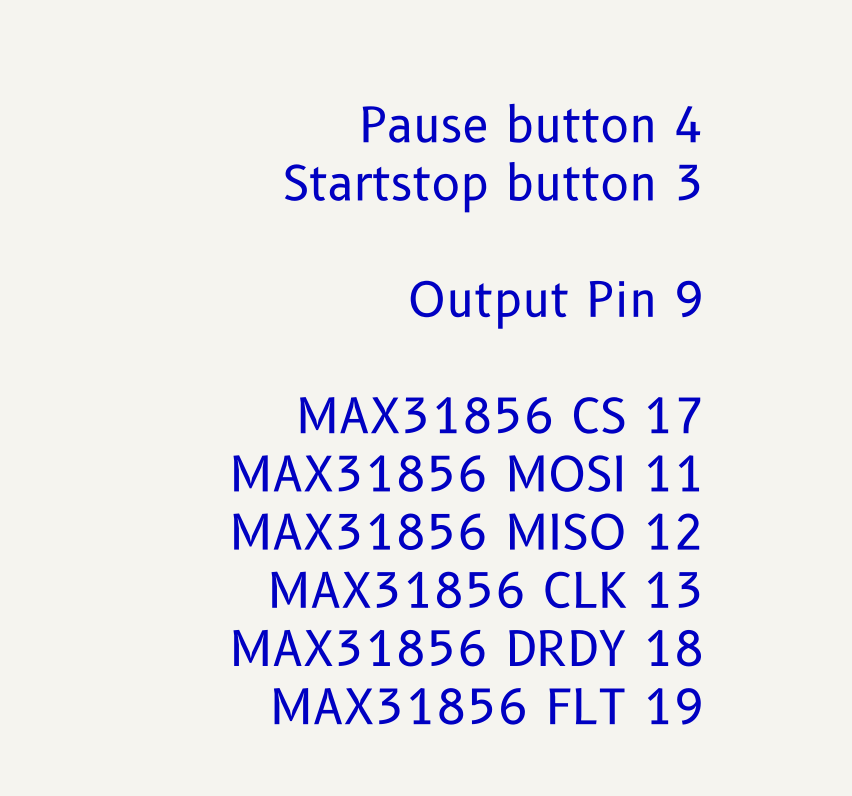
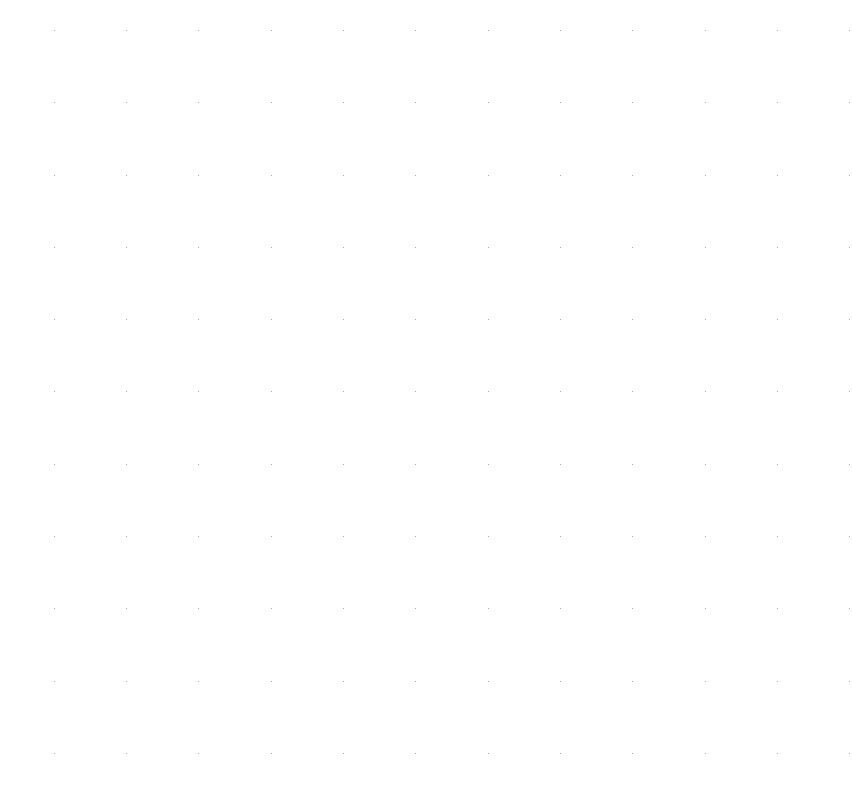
text: Pause button 4 (531, 123) -> none
text: Startstop button 3 (492, 187) -> none
text: Output Pin 9 (555, 304) -> none
text: MAX31856 CS 17 (500, 415) -> none
text: MAX31856 MOSI 11 (466, 473) -> none
text: MAX31856 MISO 12 (466, 531) -> none
text: MAX31856 CLK 13 (485, 589) -> none
text: MAX31856 DRDY 18 (467, 648) -> none
text: MAX31856 FLT 19 (487, 706) -> none

